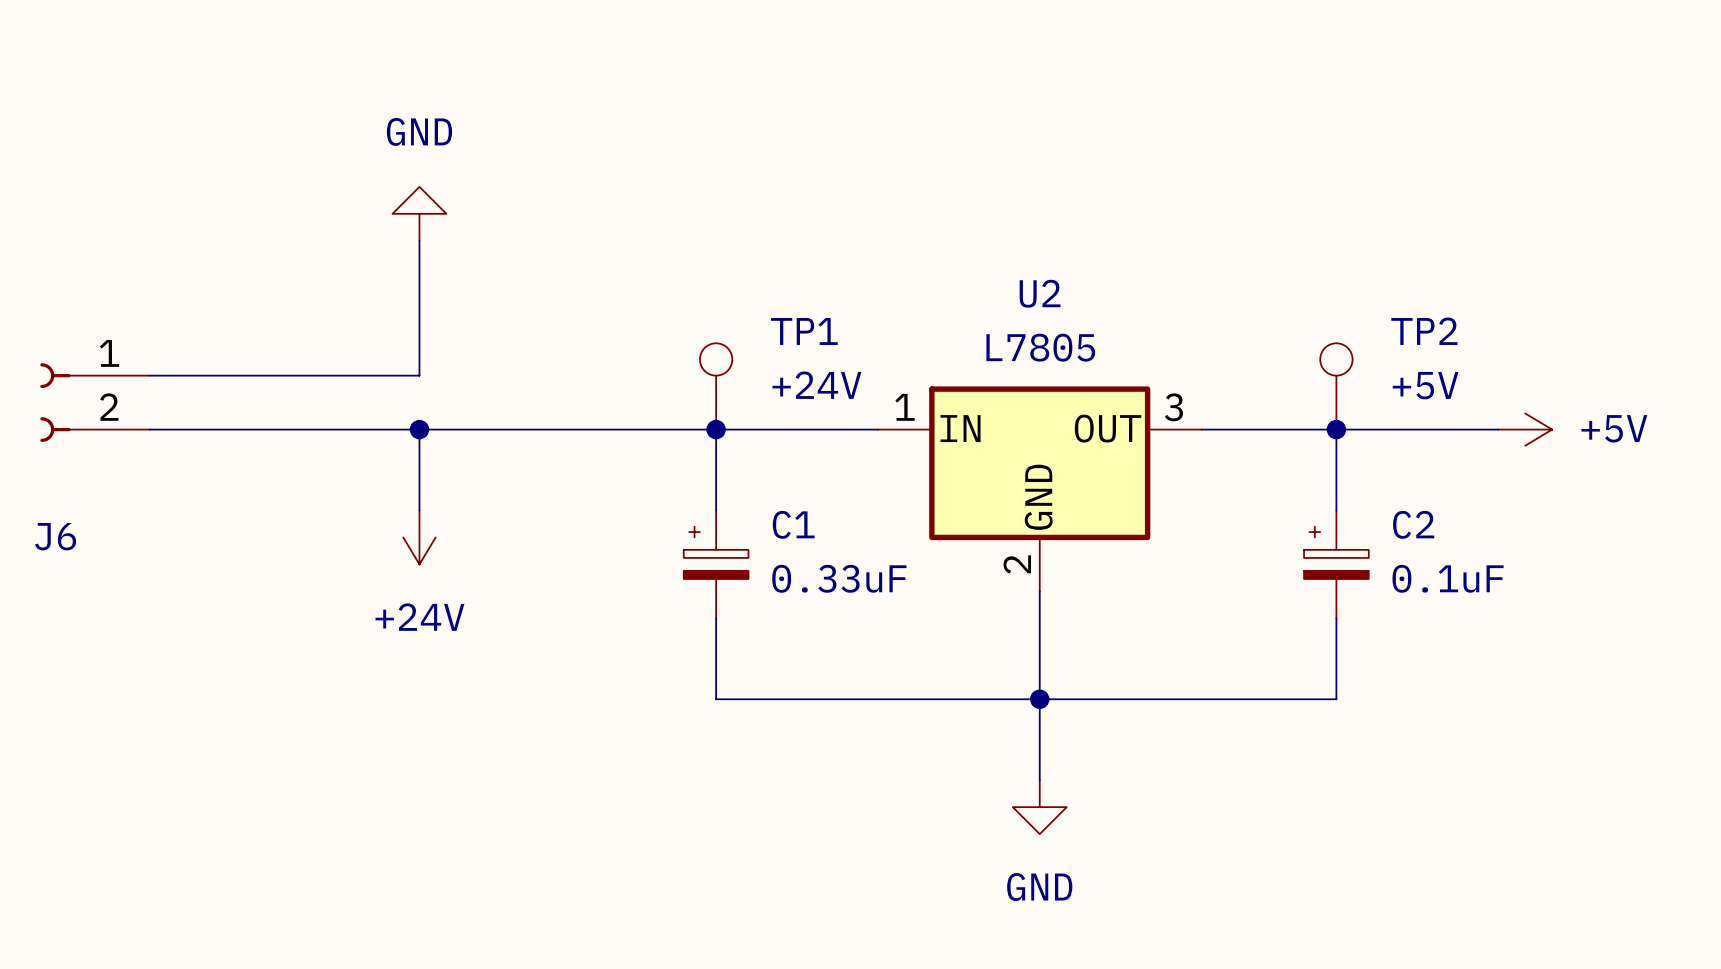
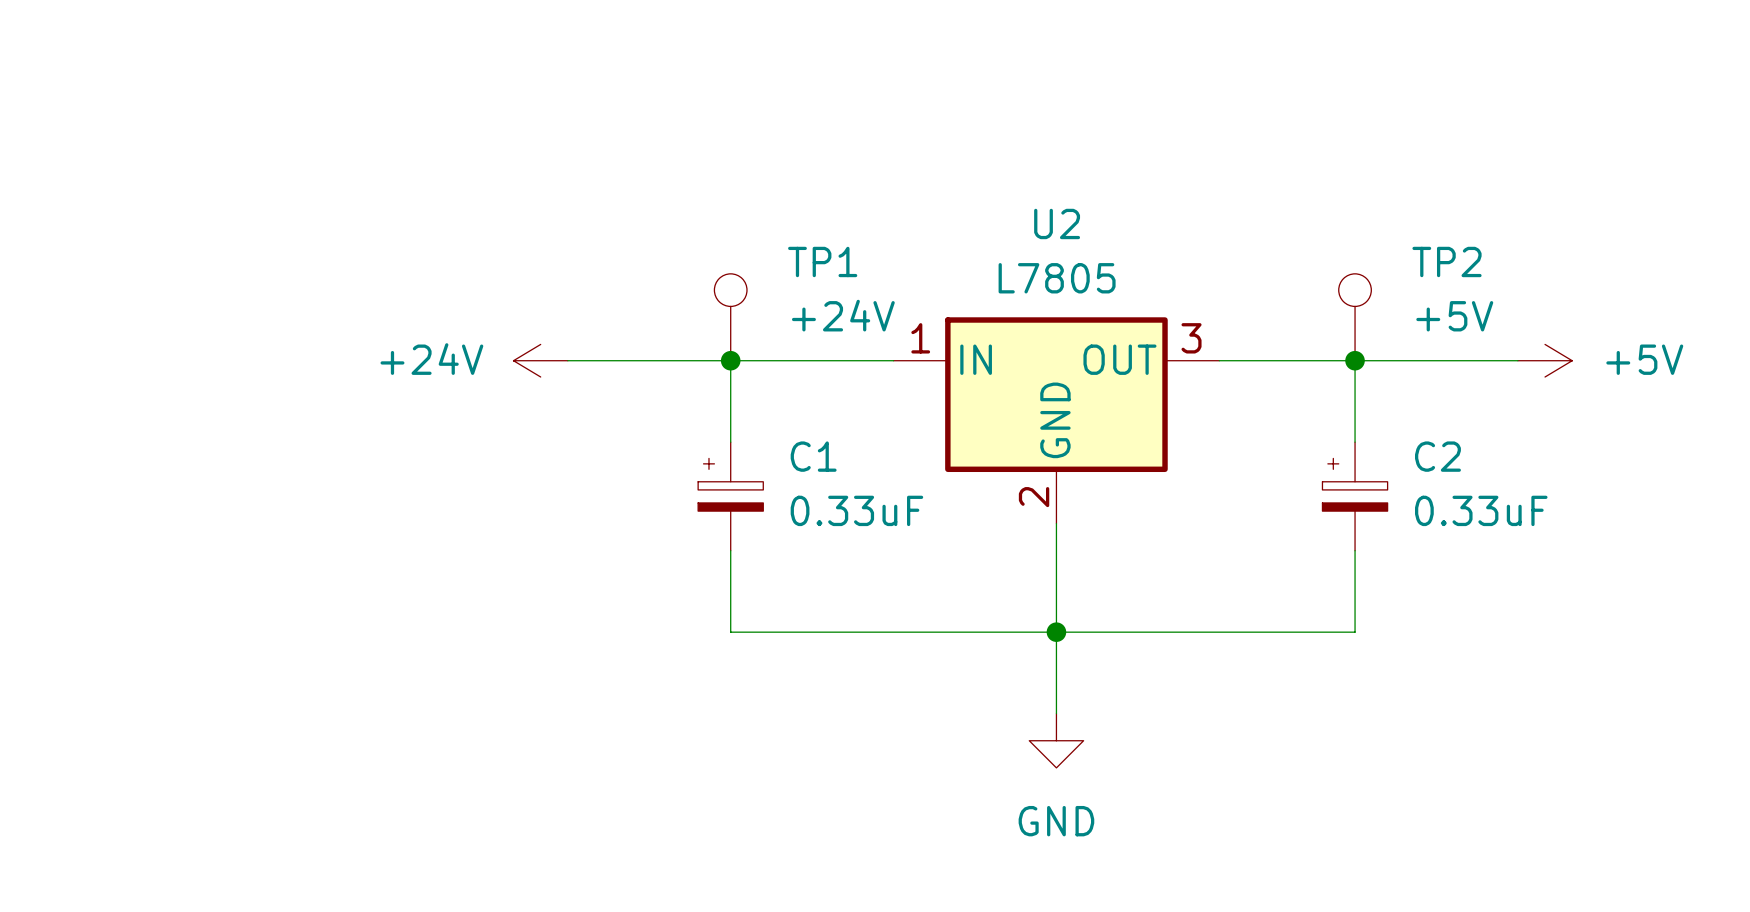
power symbol: GND (419, 213) -> none
wire: (419, 240) (419, 375) (149, 375) -> none
J6: (95, 402) -> none
wire: (149, 429) (554, 429) -> none
wire: (419, 429) (419, 510) -> none
junction: (419, 429) -> none
power symbol rotation: 0° (419, 537) -> 90° clockwise (540, 360)
power symbol position: +24V (419, 537) -> +24V (540, 360)
C2 value: 0.1uF (1448, 578) -> 0.33uF (1481, 510)

